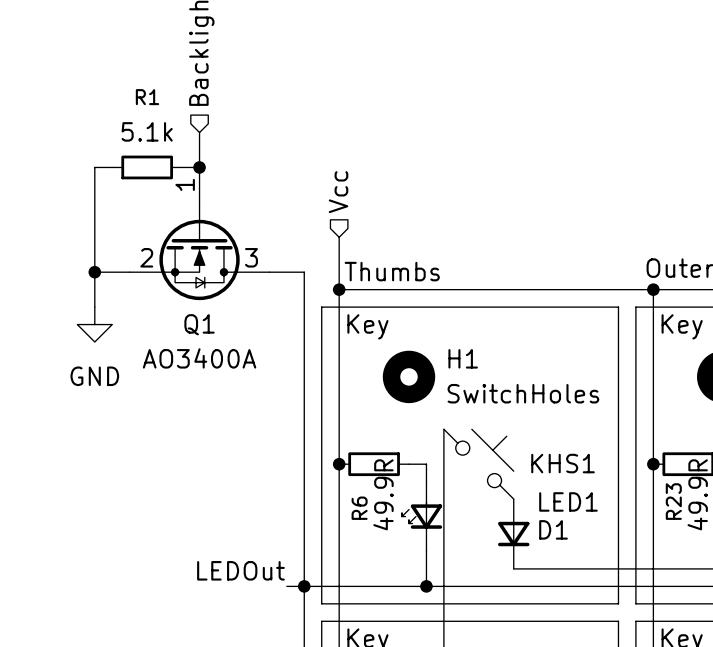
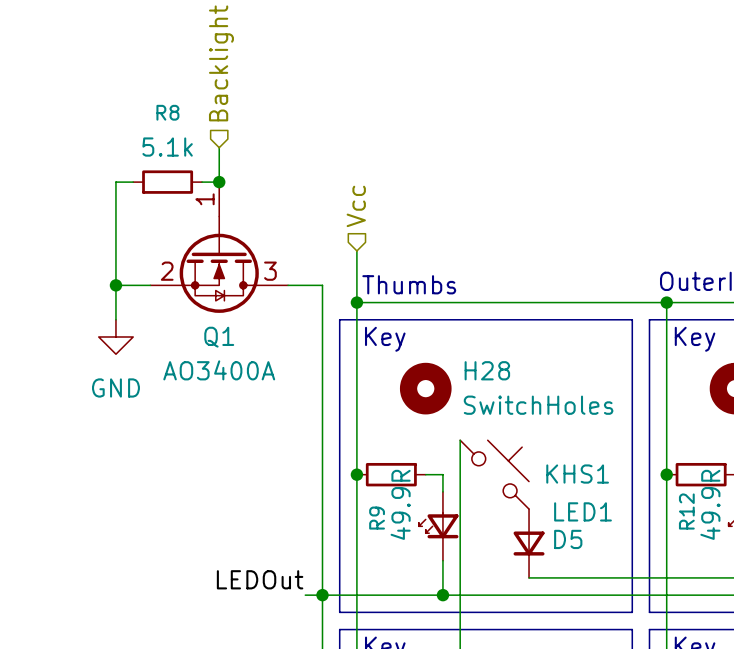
R1 name: R1 (147, 97) -> R8 (167, 112)
H1 name: H1 (463, 358) -> H28 (487, 370)
R23 name: R23 (673, 501) -> R12 (686, 511)
R6 name: R6 (359, 508) -> R9 (377, 518)
D1 name: D1 (553, 529) -> D5 (568, 539)

